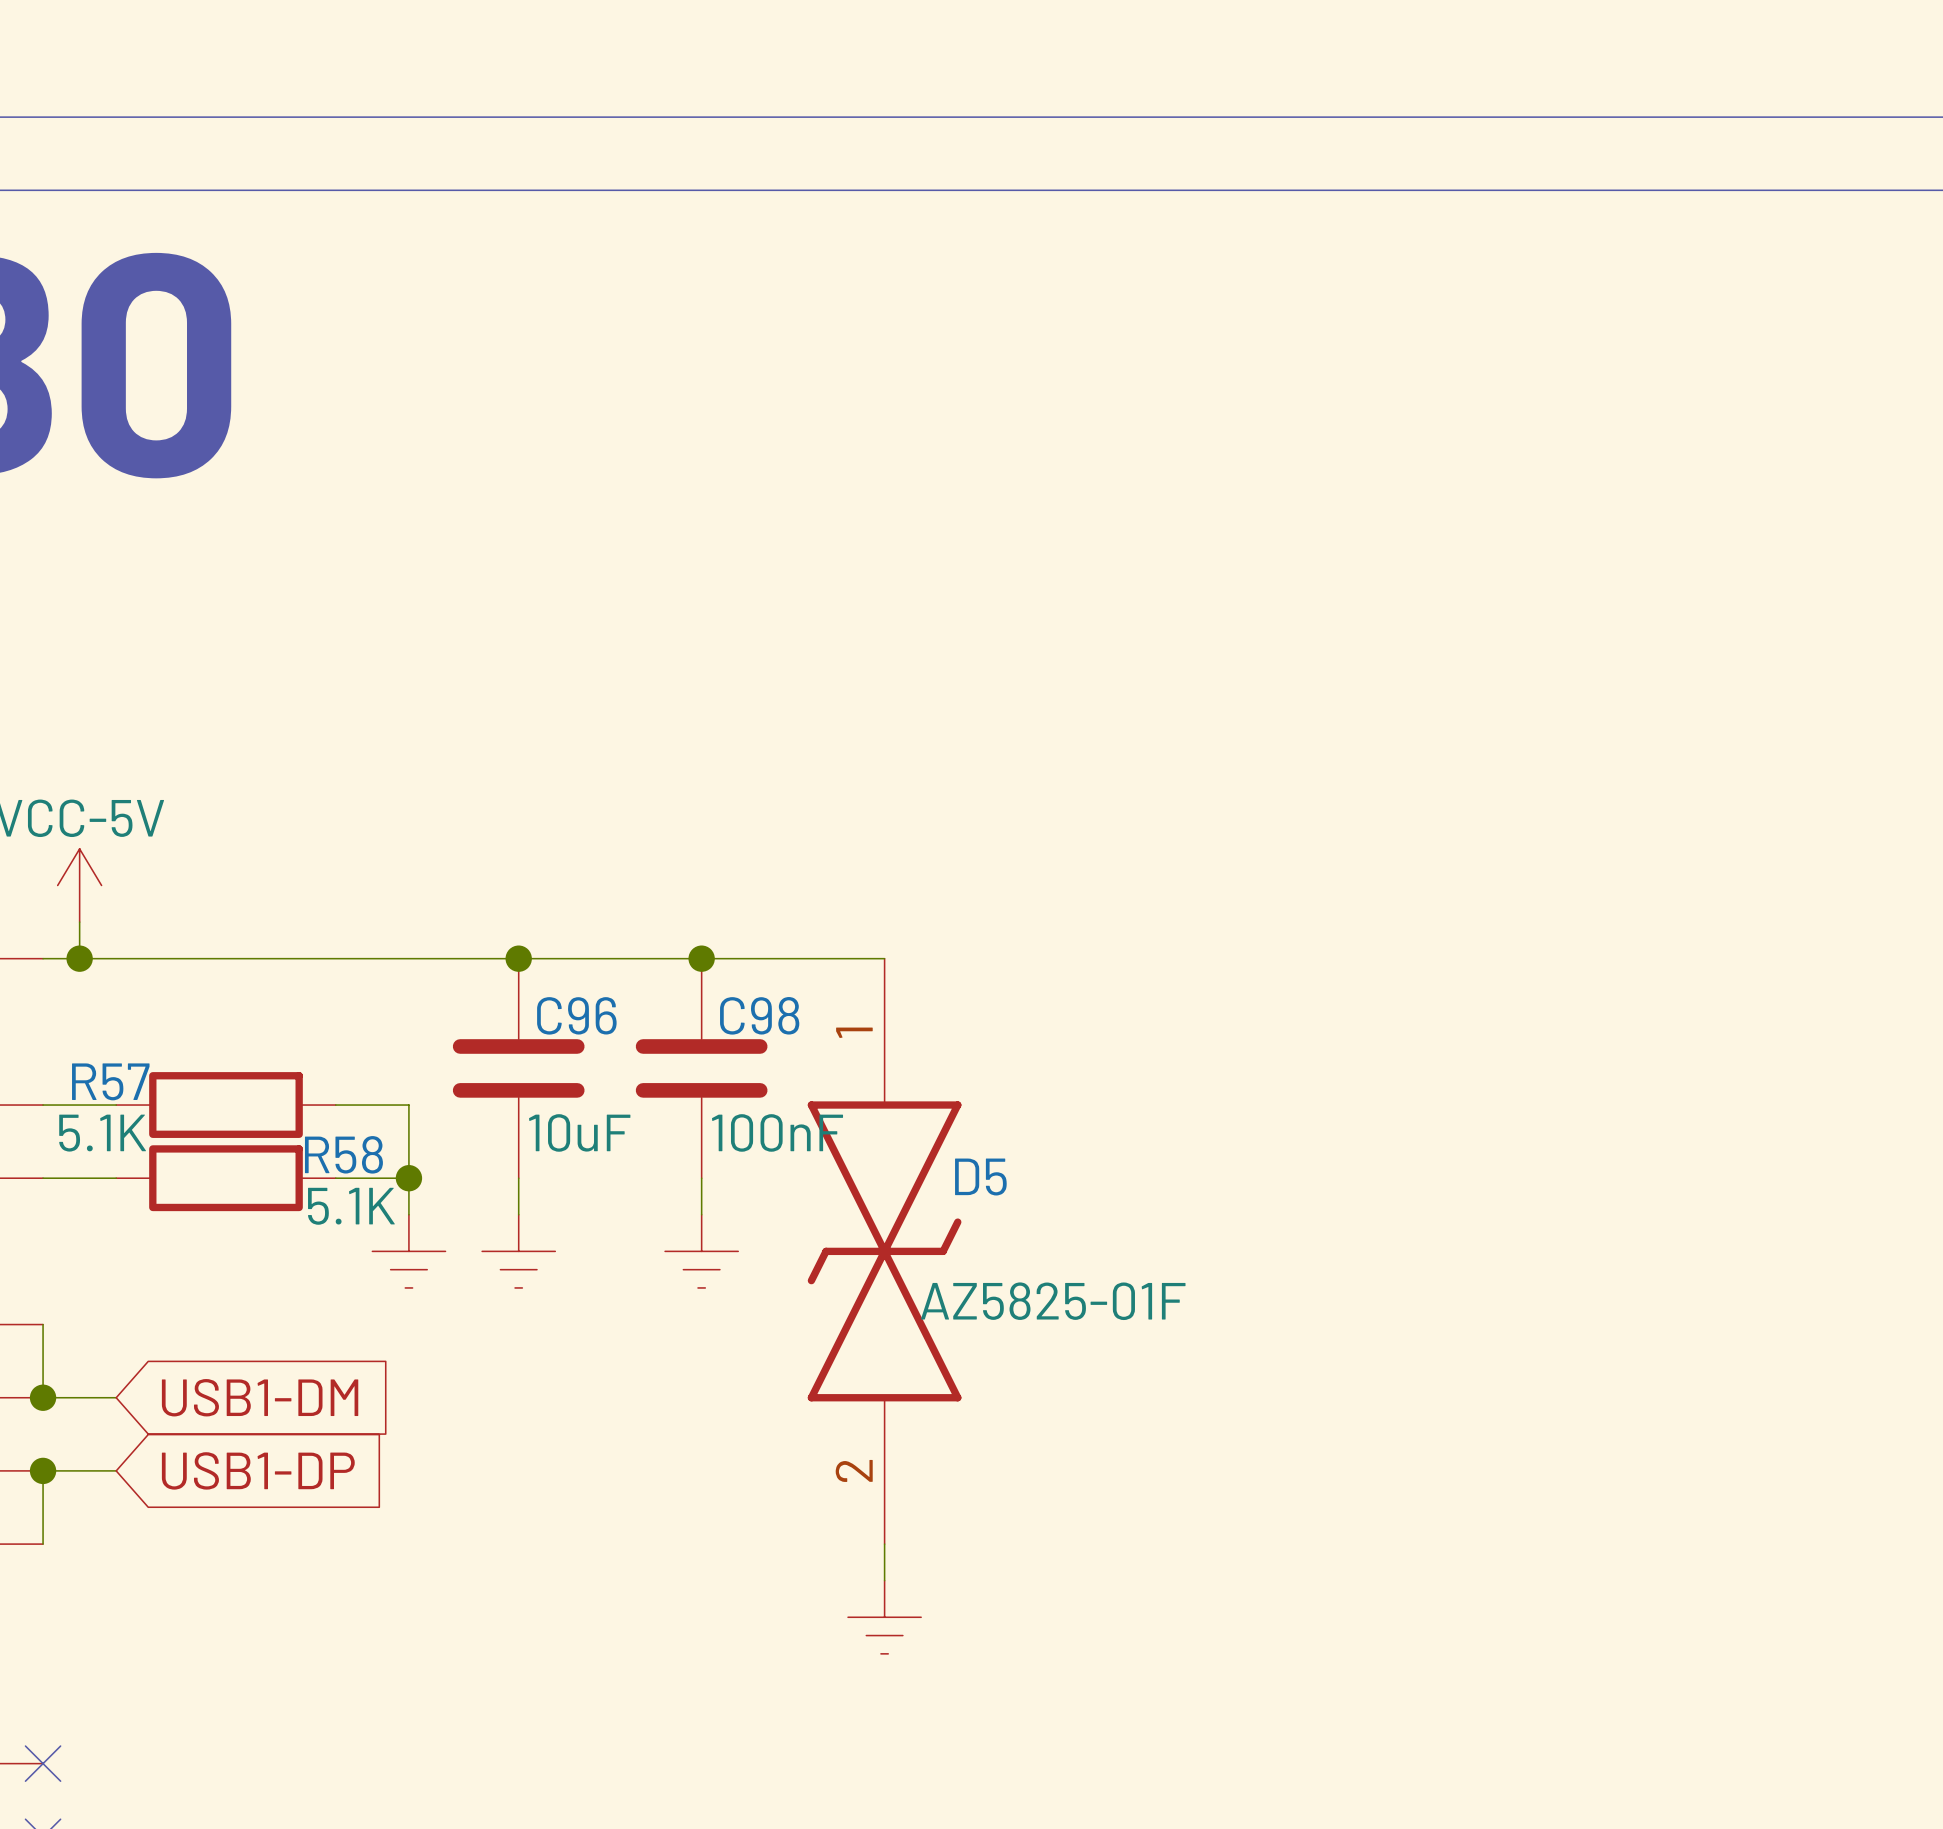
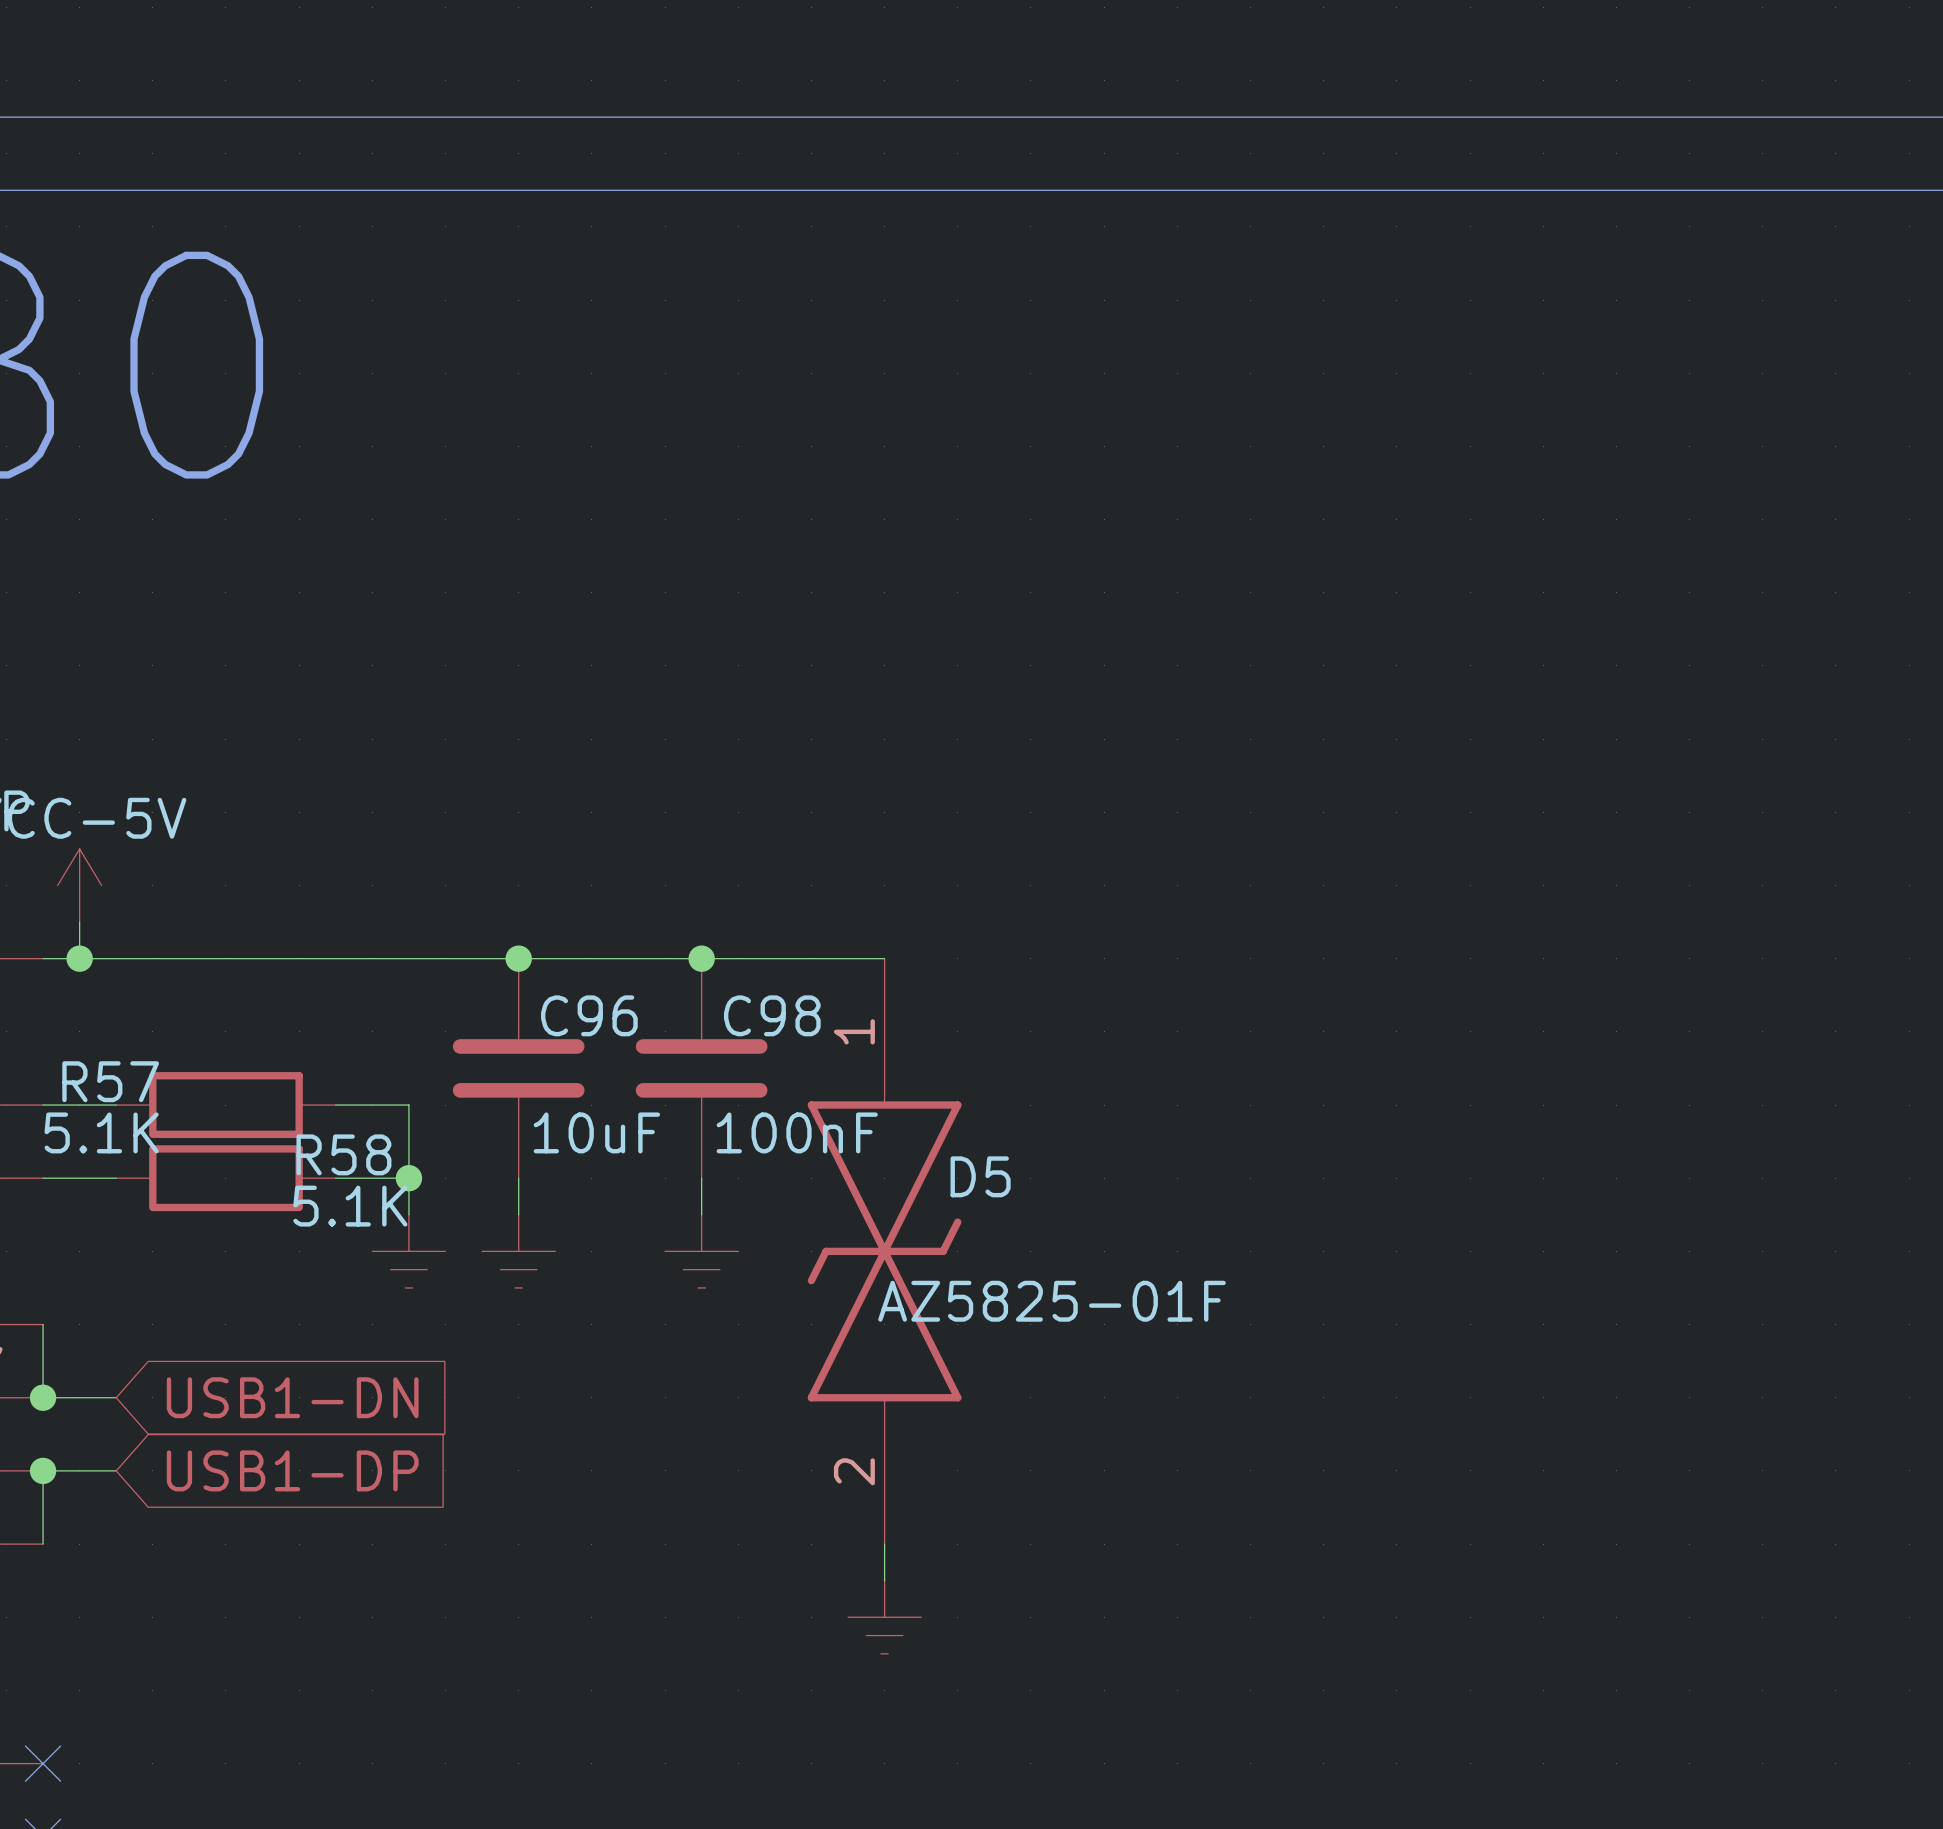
global label: USB1-DM (260, 1397) -> USB1-DN (292, 1397)

